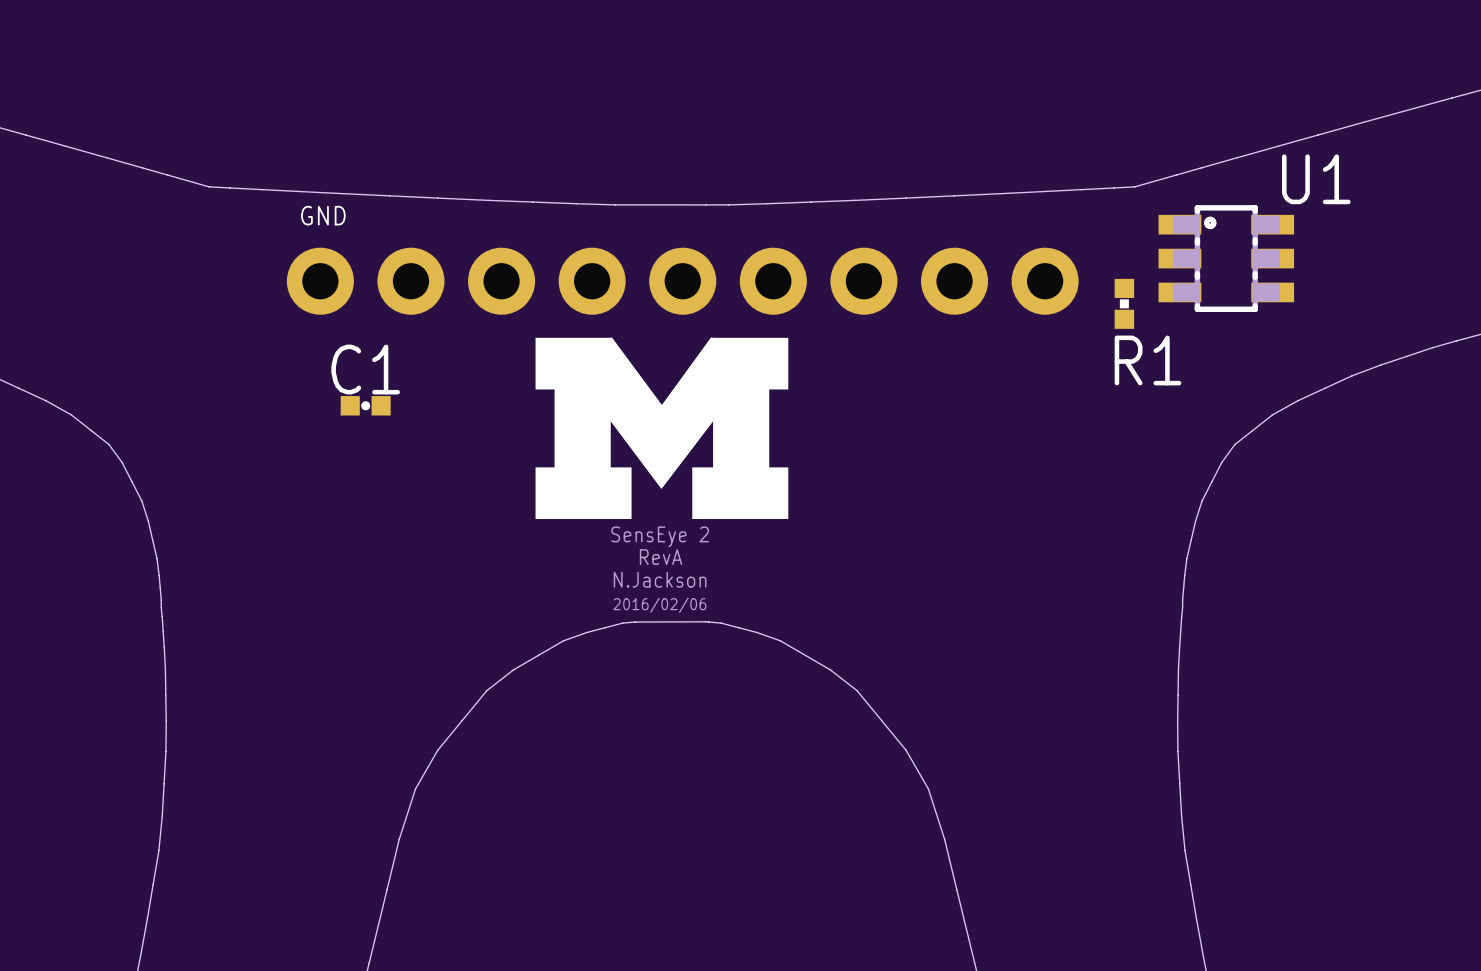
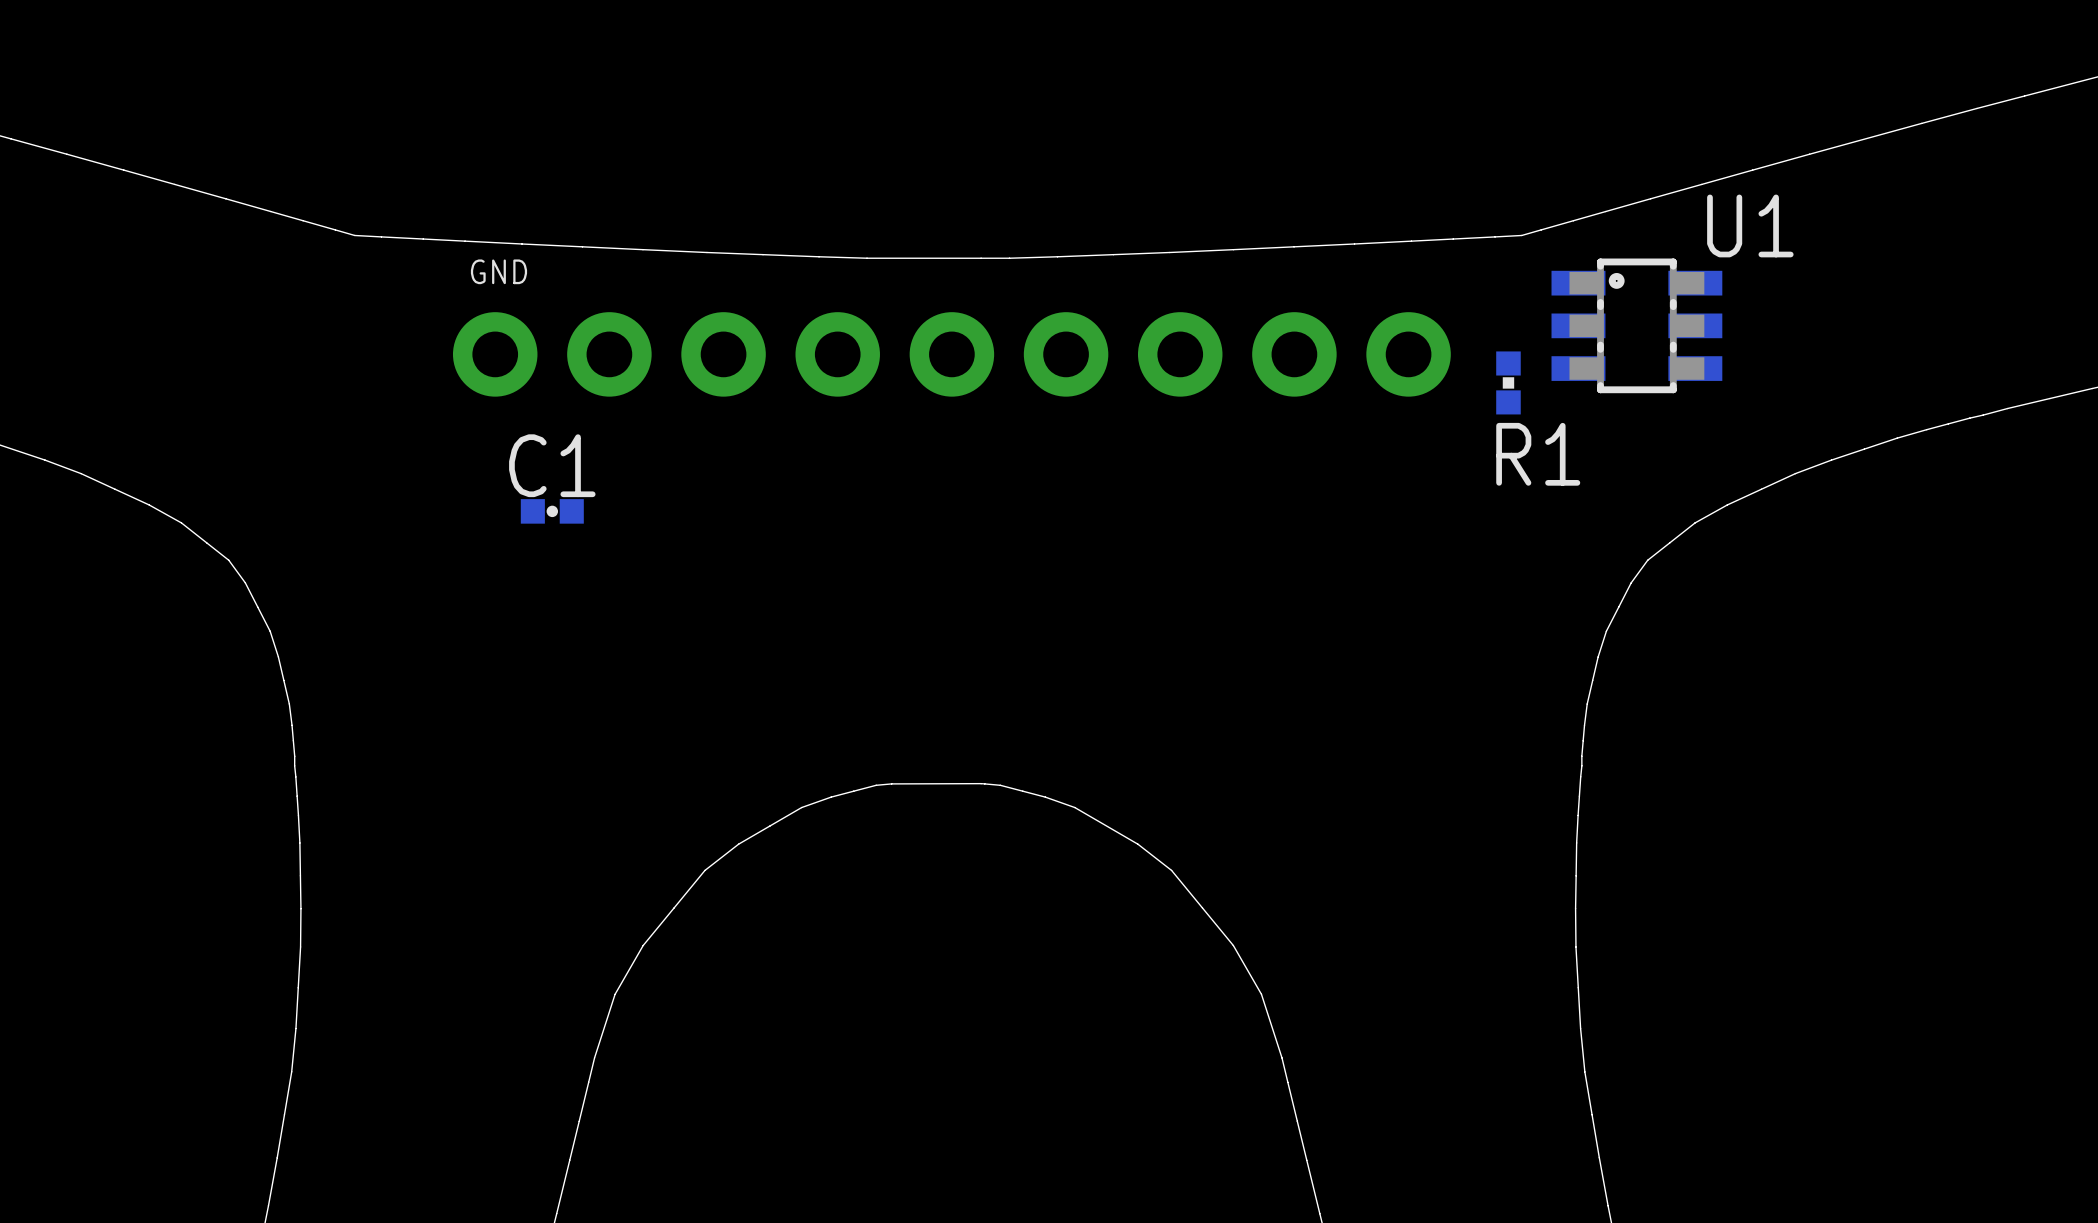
drawing: [535, 337, 789, 520] -> none
text: SensEye 2 (660, 536) -> none
text: RevA (661, 557) -> none
text: N.Jackson (660, 579) -> none
text: 2016/02/06 (659, 605) -> none

